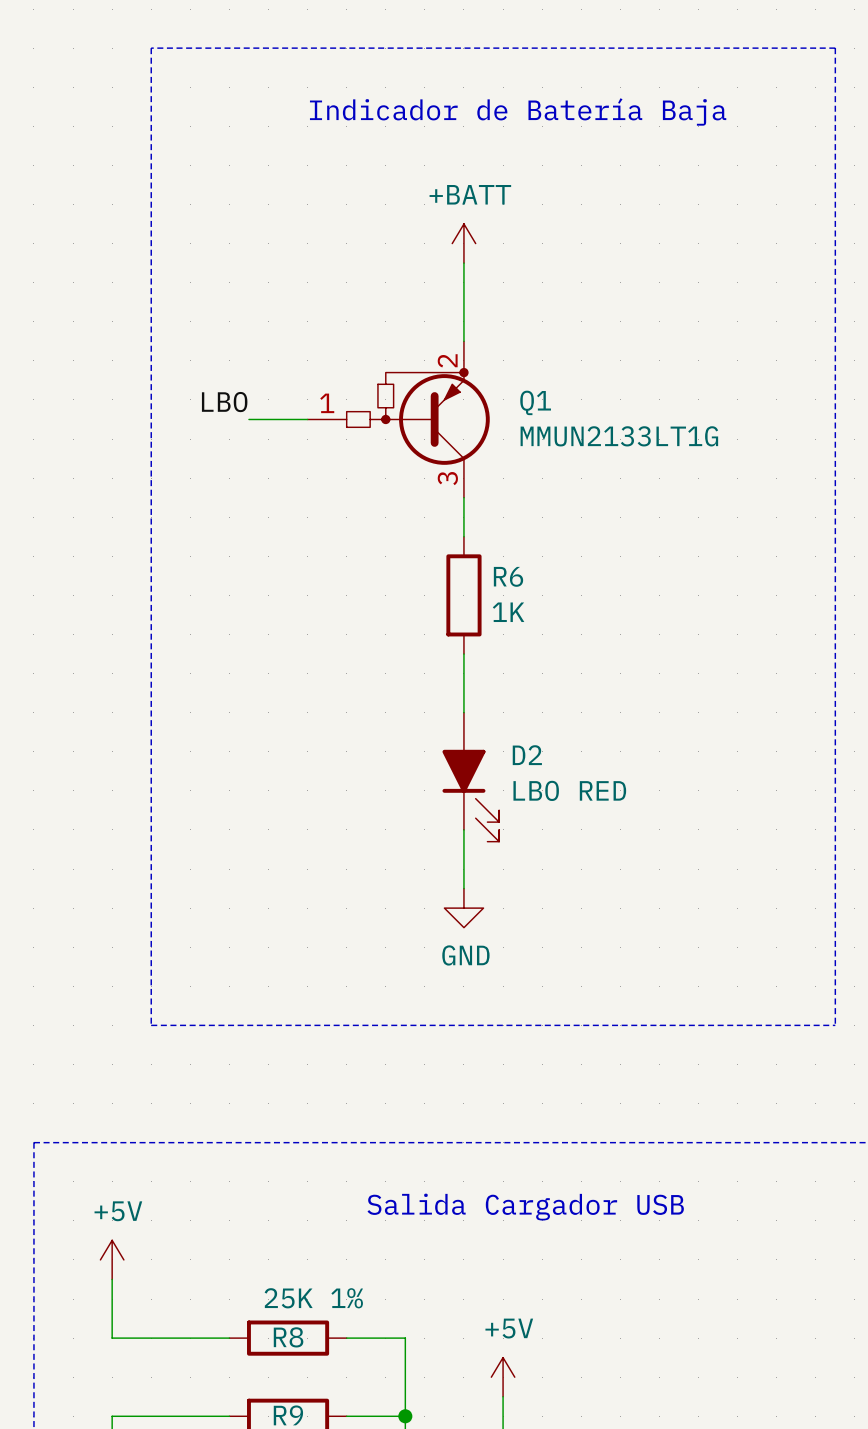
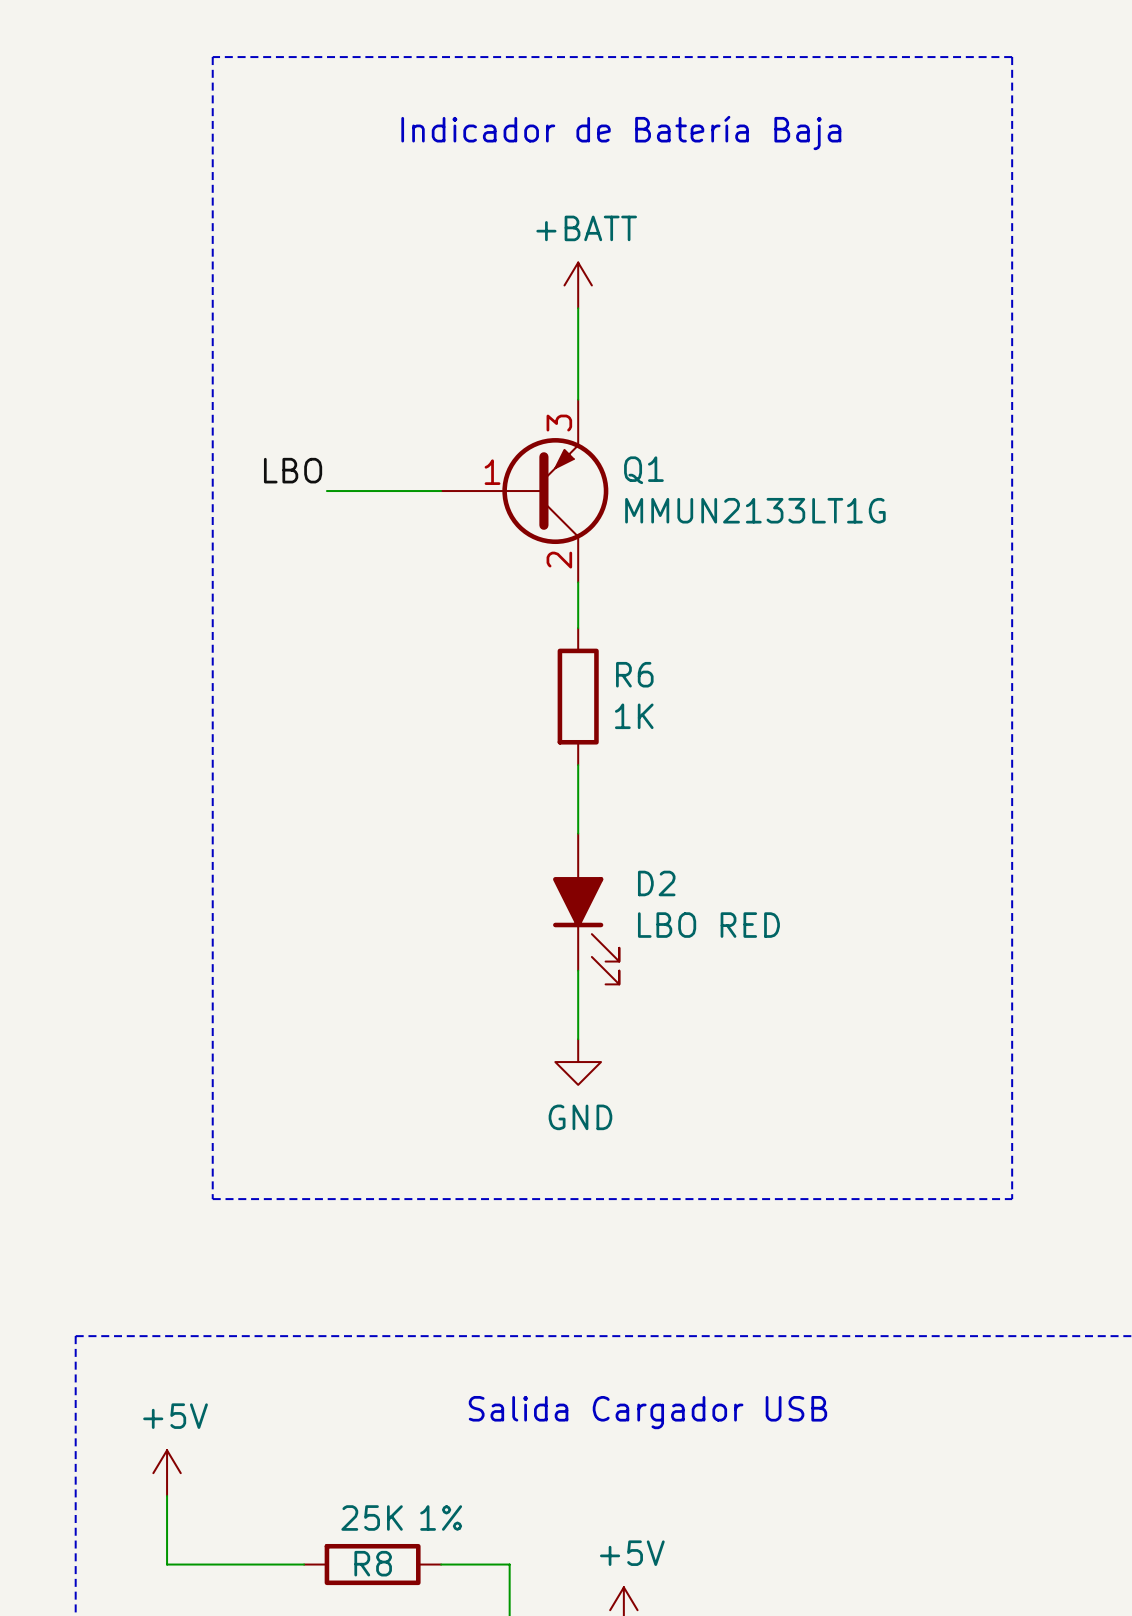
Q1 symbol: [307, 341, 490, 498] -> [441, 399, 609, 583]
Q1 name position: Q1 (535, 402) -> Q1 (643, 470)
Q1 value position: MMUN2133LT1G (619, 436) -> MMUN2133LT1G (755, 510)

